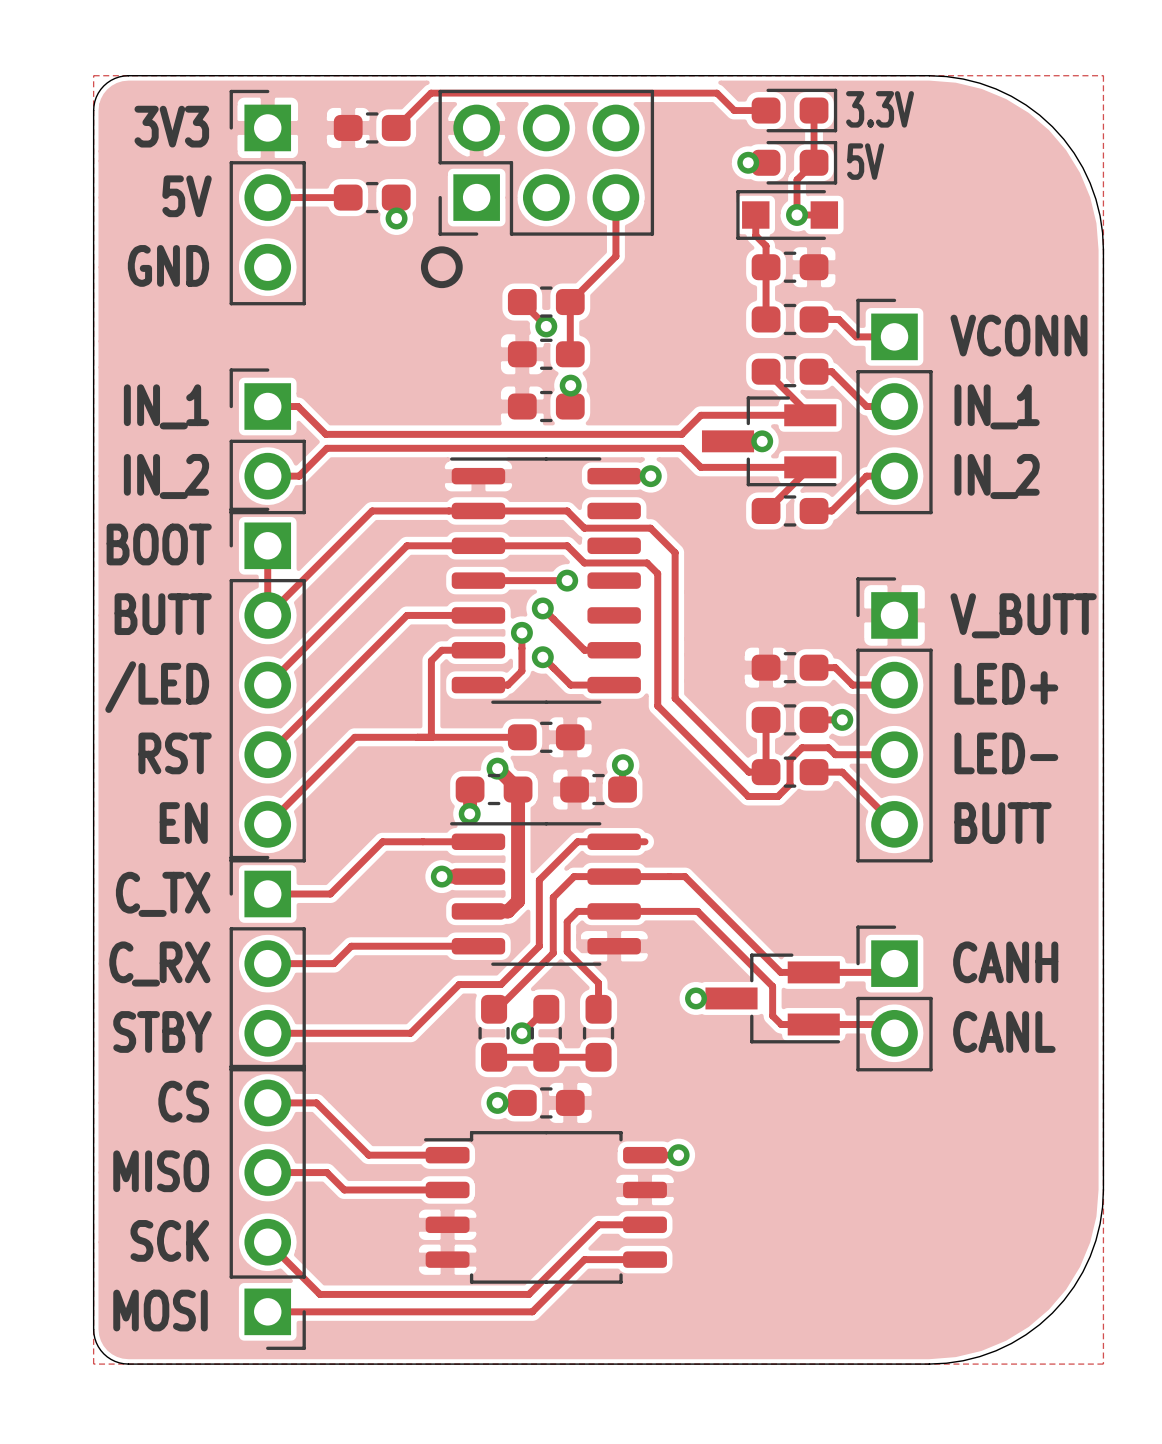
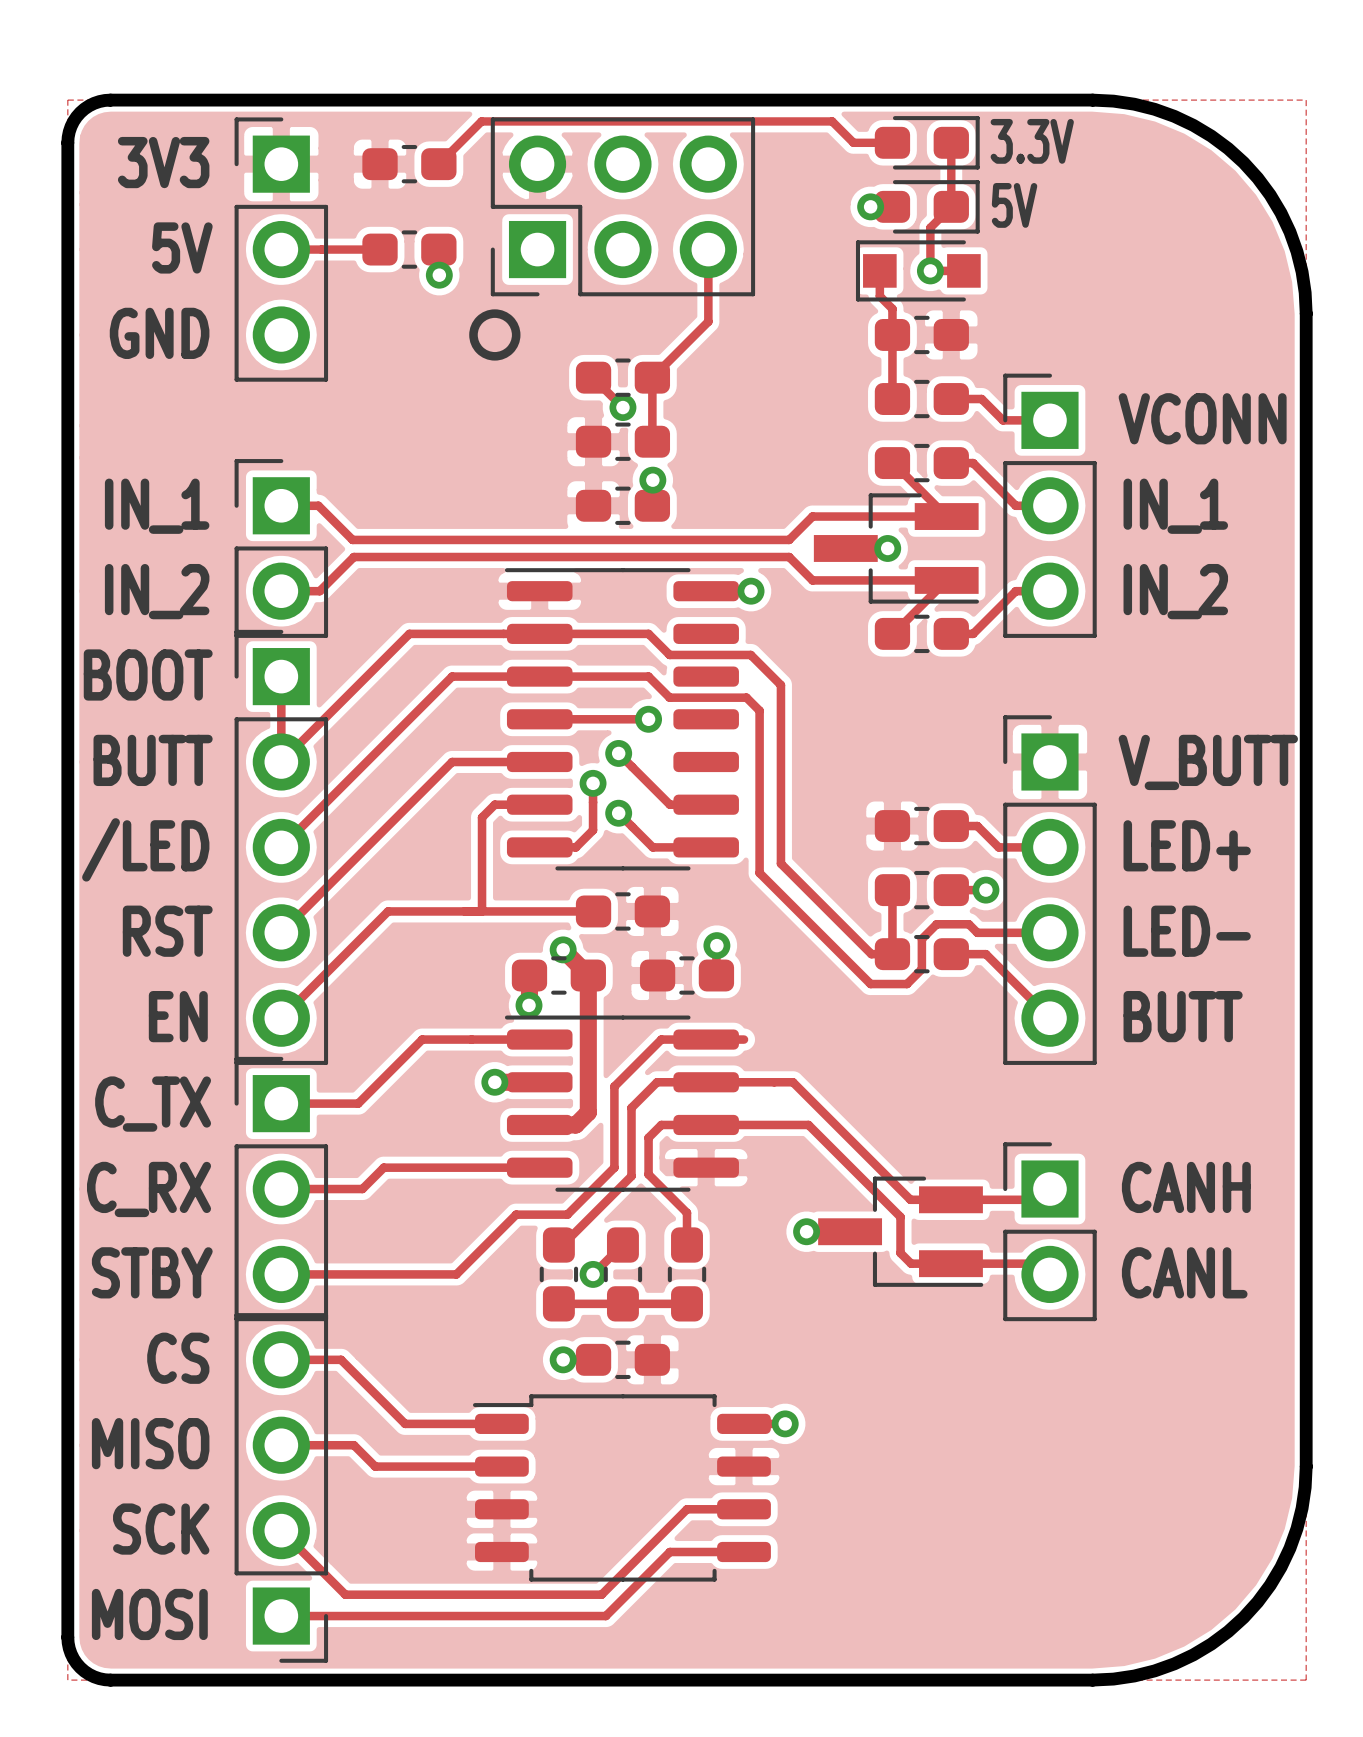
board edge width: thin (128, 1364) (115, 1361) (103, 1353) (96, 1342) (93, 1329) (93, 110) (94, 101) (100, 89) (115, 78) (128, 75) (929, 75) (963, 79) (979, 83) (1011, 96) (1026, 105) (1039, 115) (1063, 139) (1082, 167) (1095, 199) (1100, 215) (1103, 249) (1103, 1189) (1102, 1207) (1095, 1240) (1082, 1272) (1074, 1286) (1052, 1313) (1026, 1334) (1011, 1343) (979, 1356) (946, 1363) (128, 1364) -> thick (110, 1680) (94, 1676) (80, 1667) (71, 1653) (67, 1637) (67, 142) (69, 131) (76, 116) (94, 103) (110, 100) (1092, 100) (1134, 104) (1154, 109) (1193, 125) (1211, 136) (1228, 148) (1257, 178) (1280, 212) (1297, 251) (1302, 271) (1306, 313) (1306, 1466) (1305, 1487) (1297, 1528) (1280, 1567) (1270, 1585) (1243, 1617) (1211, 1644) (1193, 1654) (1154, 1670) (1113, 1679) (110, 1680)

